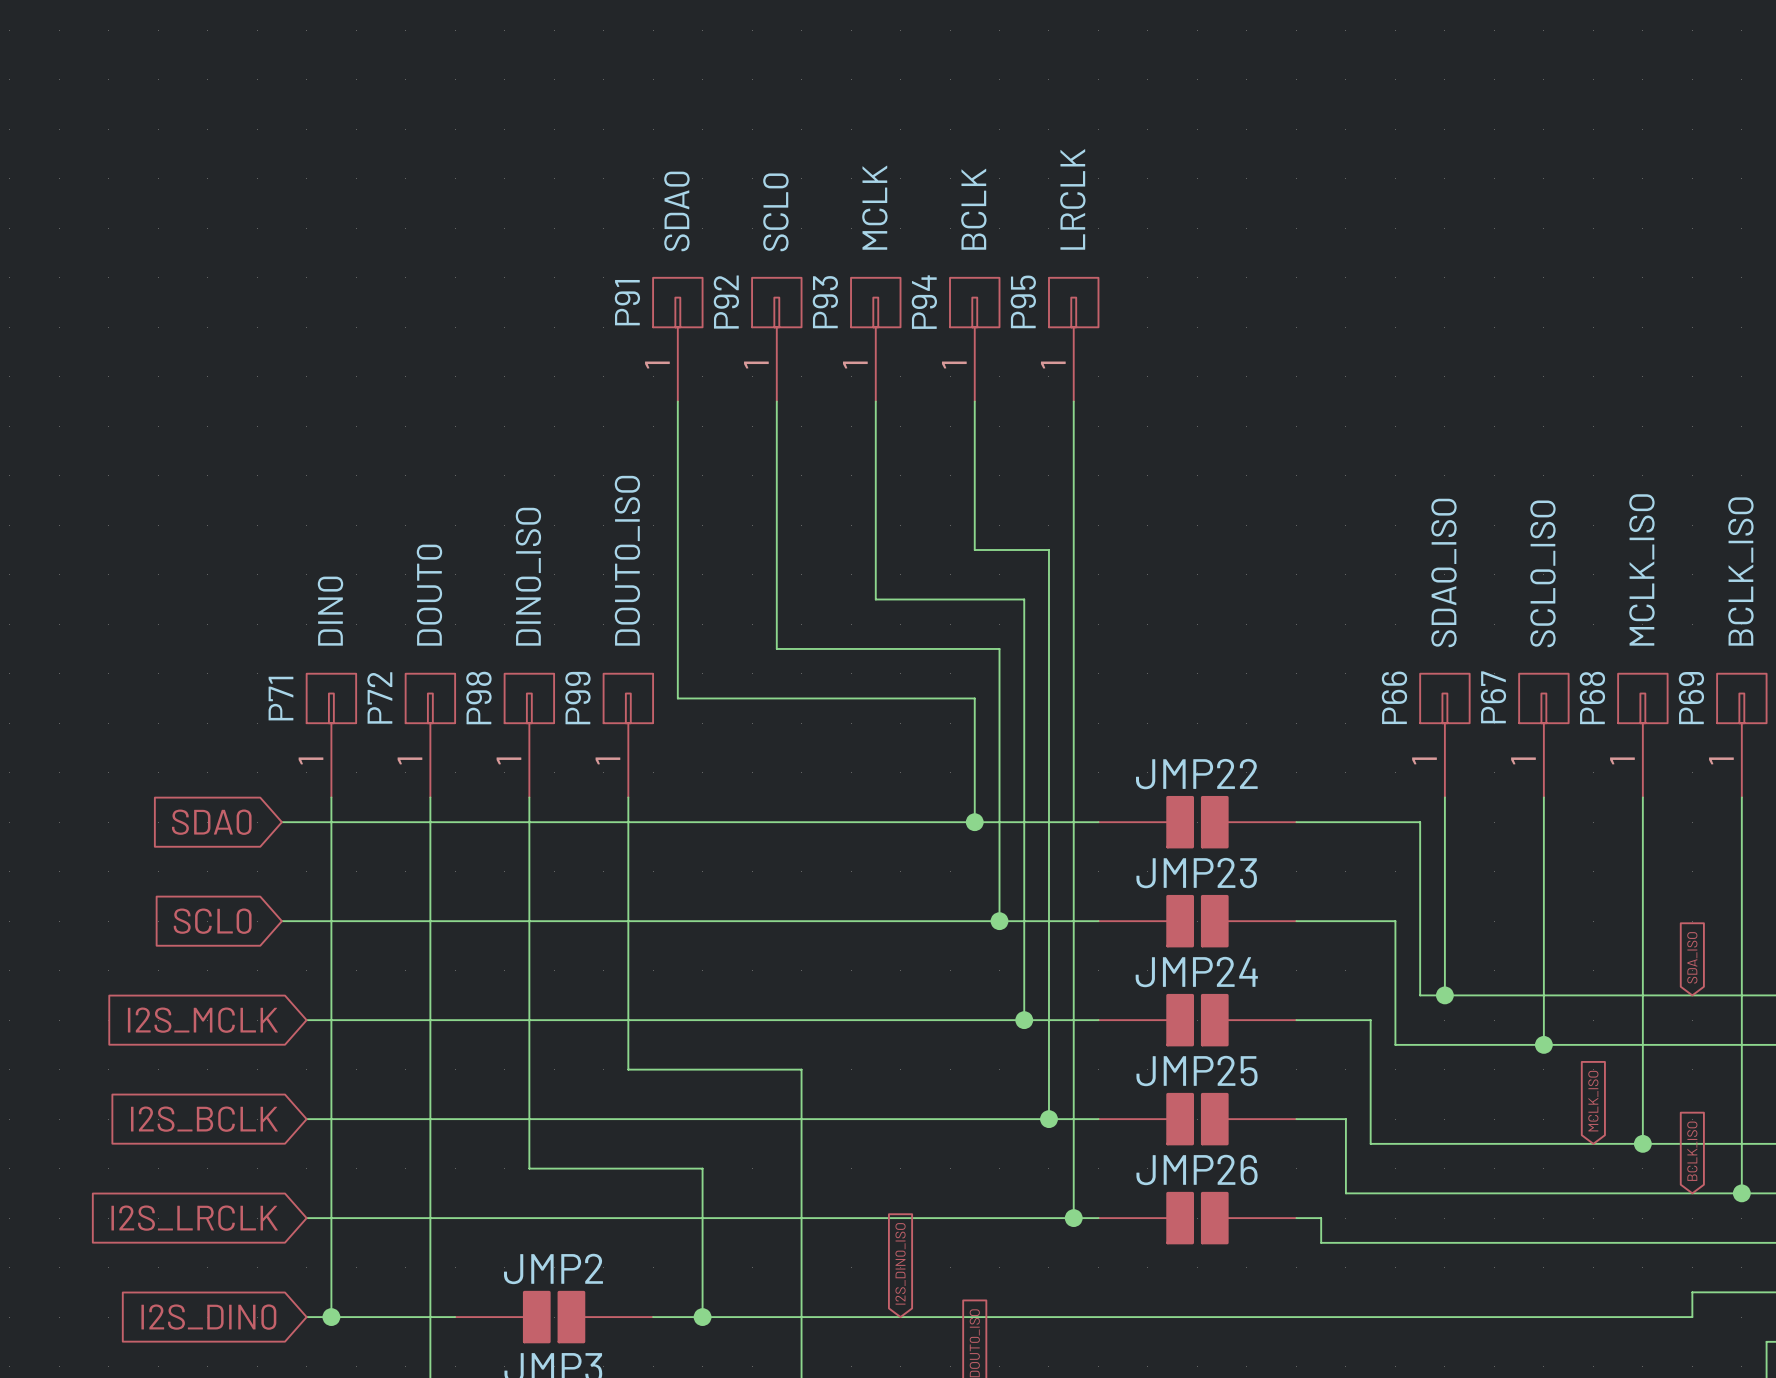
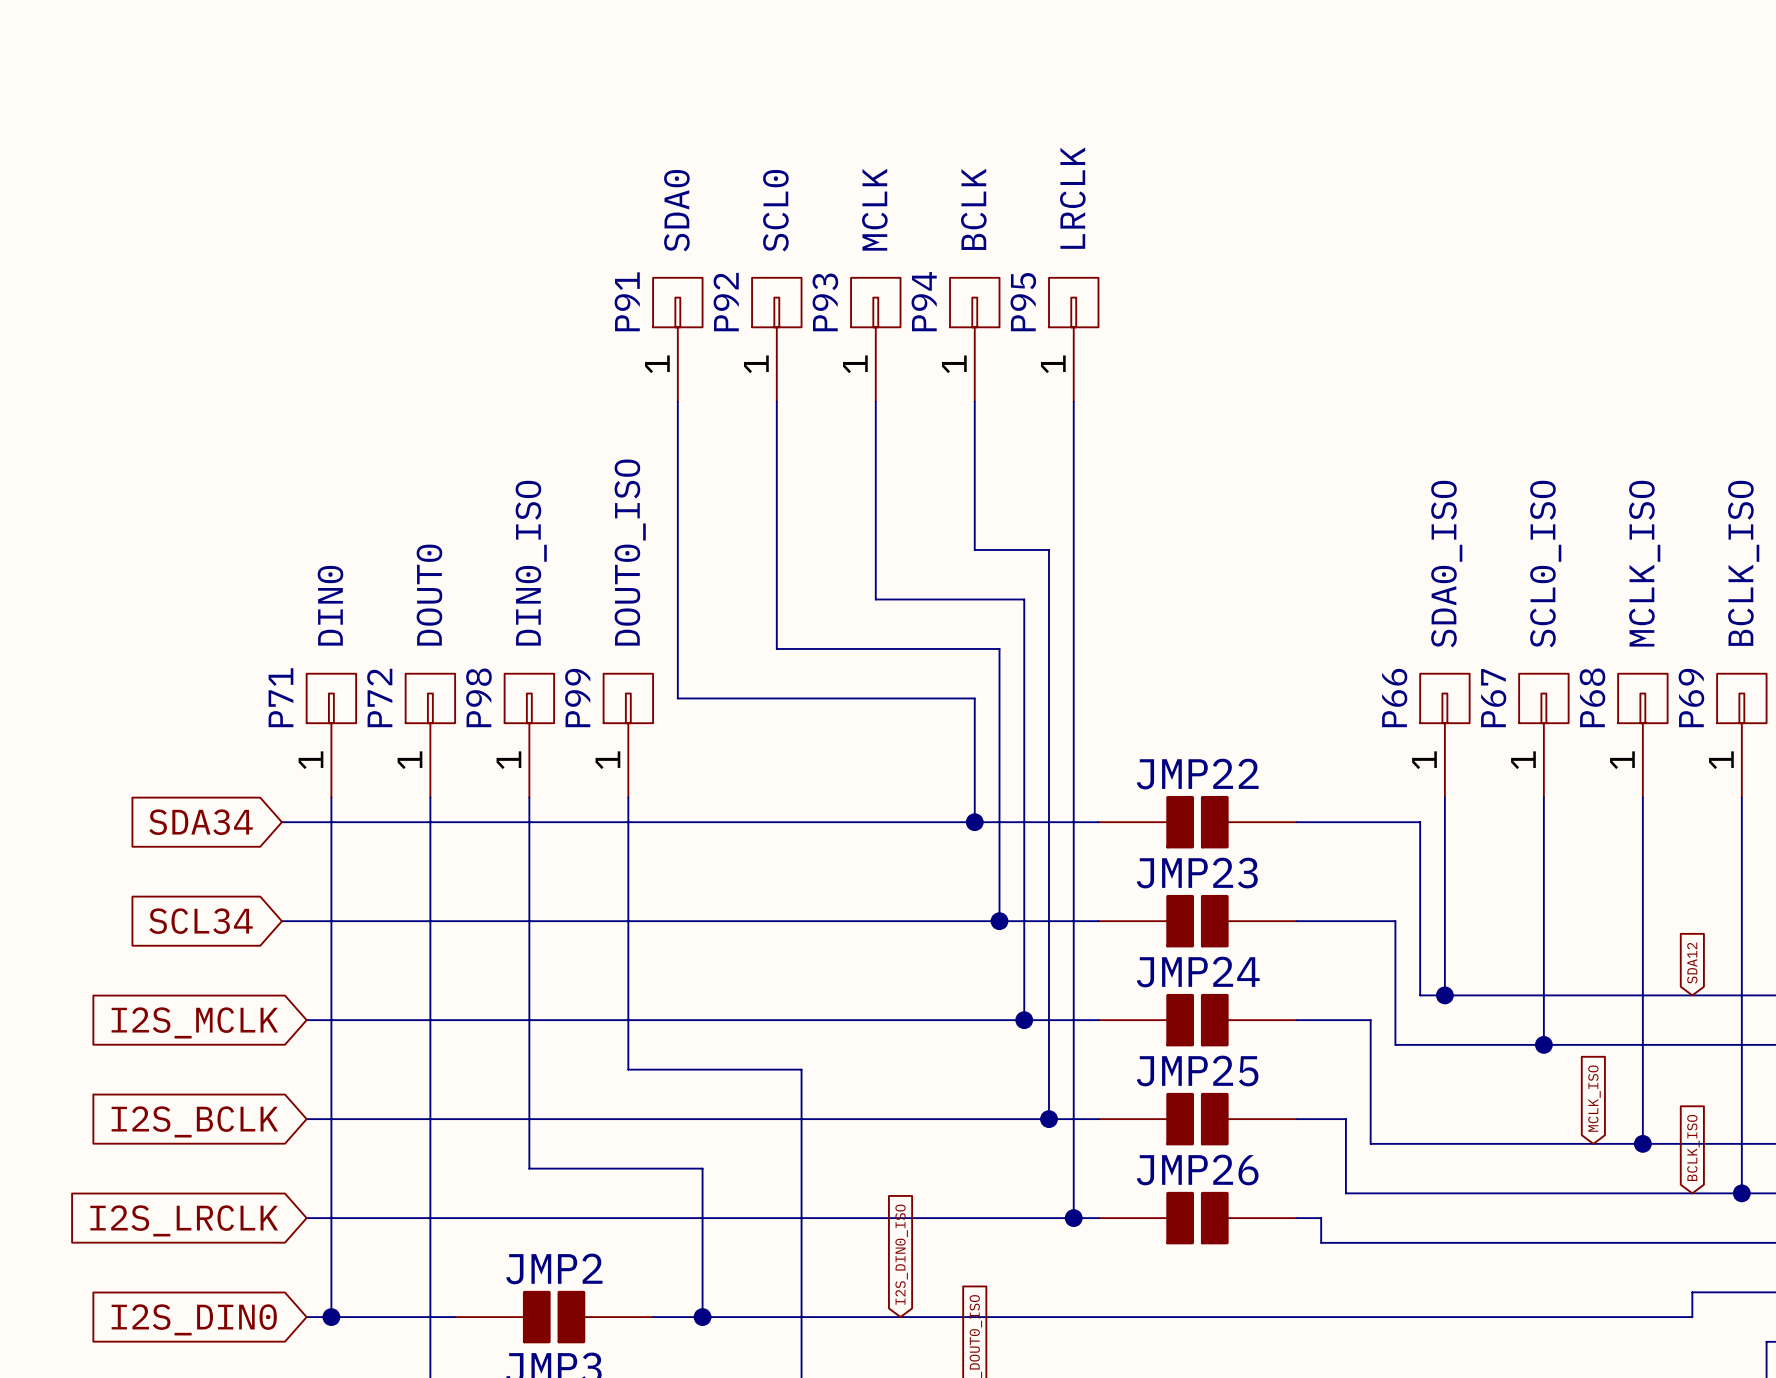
global label: SDA0 (211, 822) -> SDA34 (201, 822)
global label: SCL0 (212, 921) -> SCL34 (201, 921)
global label: SDA_ISO (1692, 957) -> SDA12 (1692, 963)

